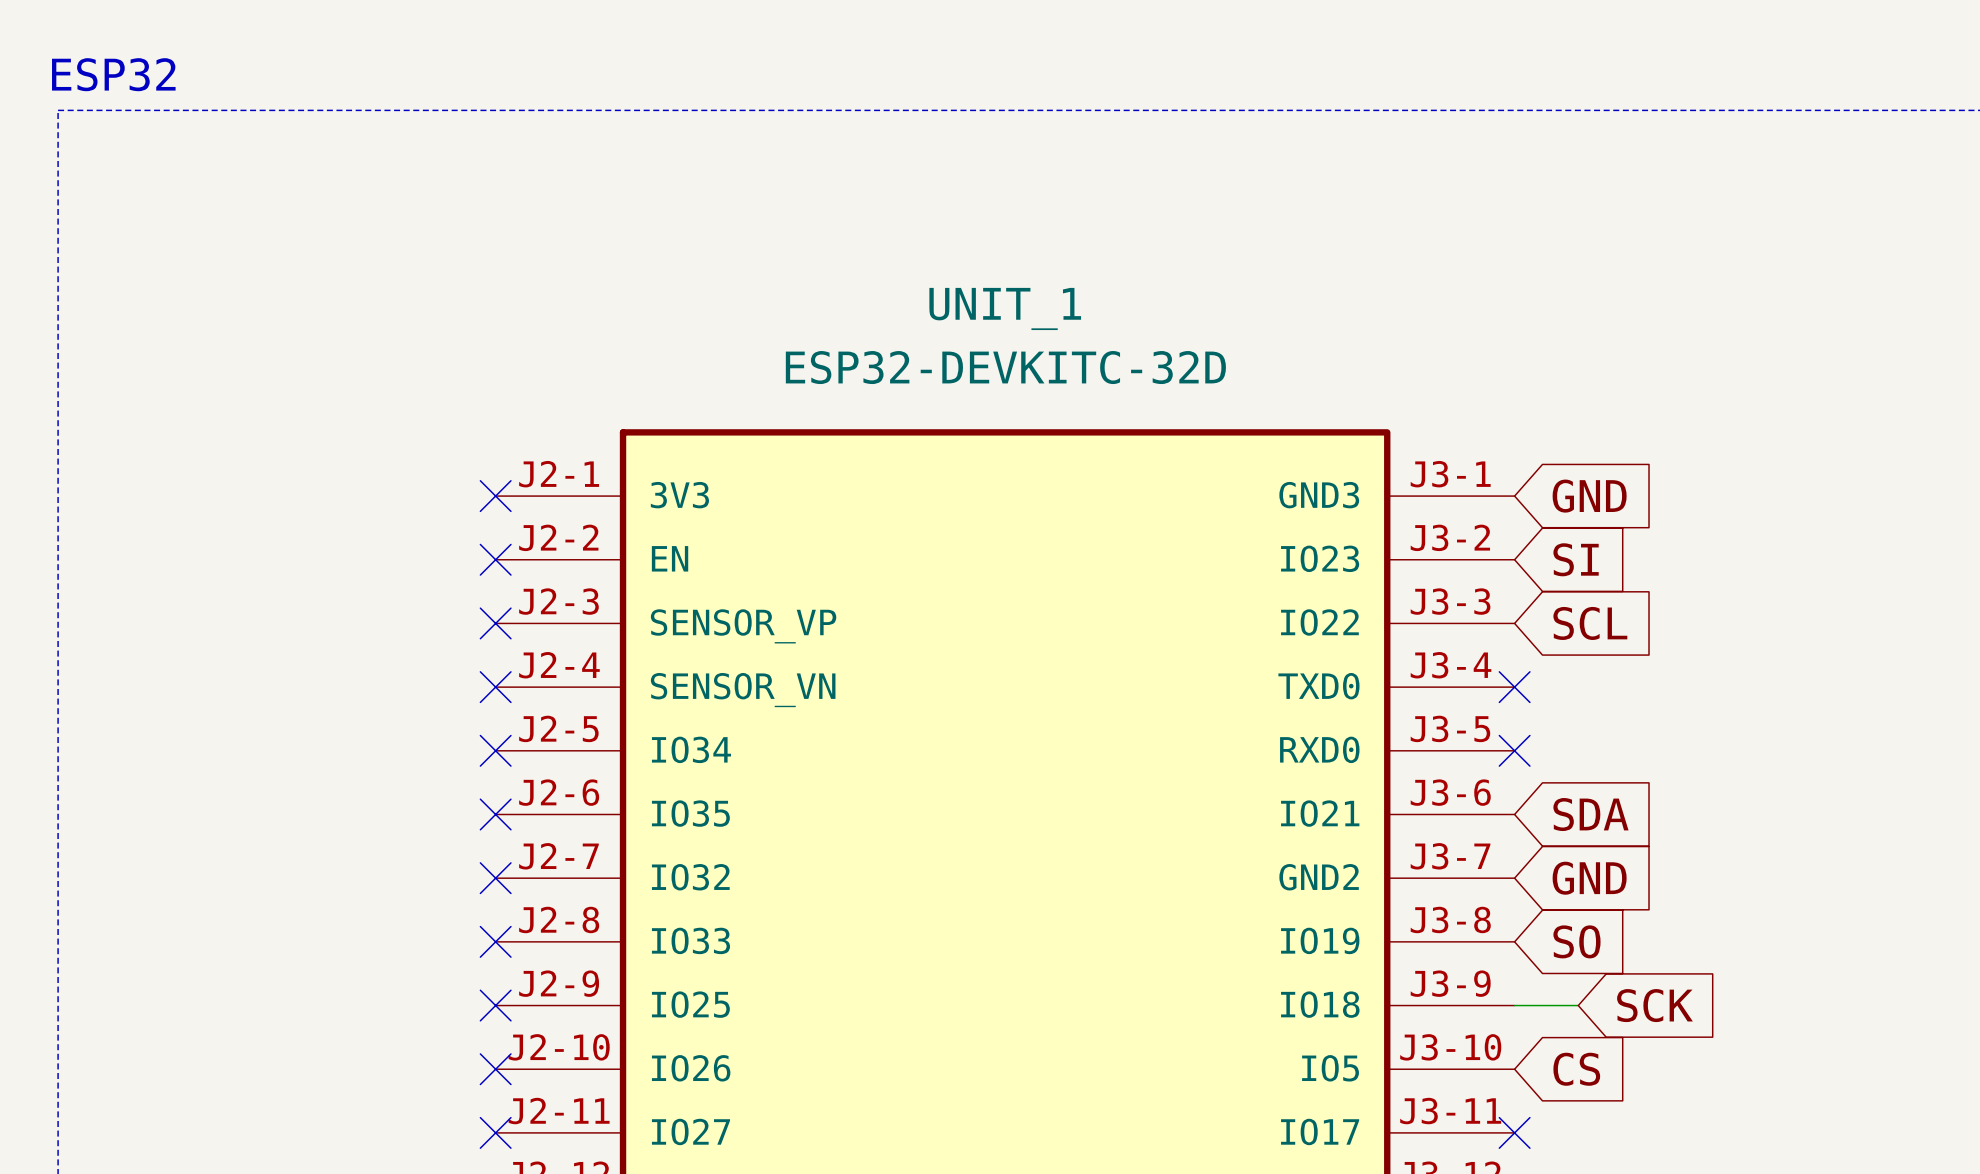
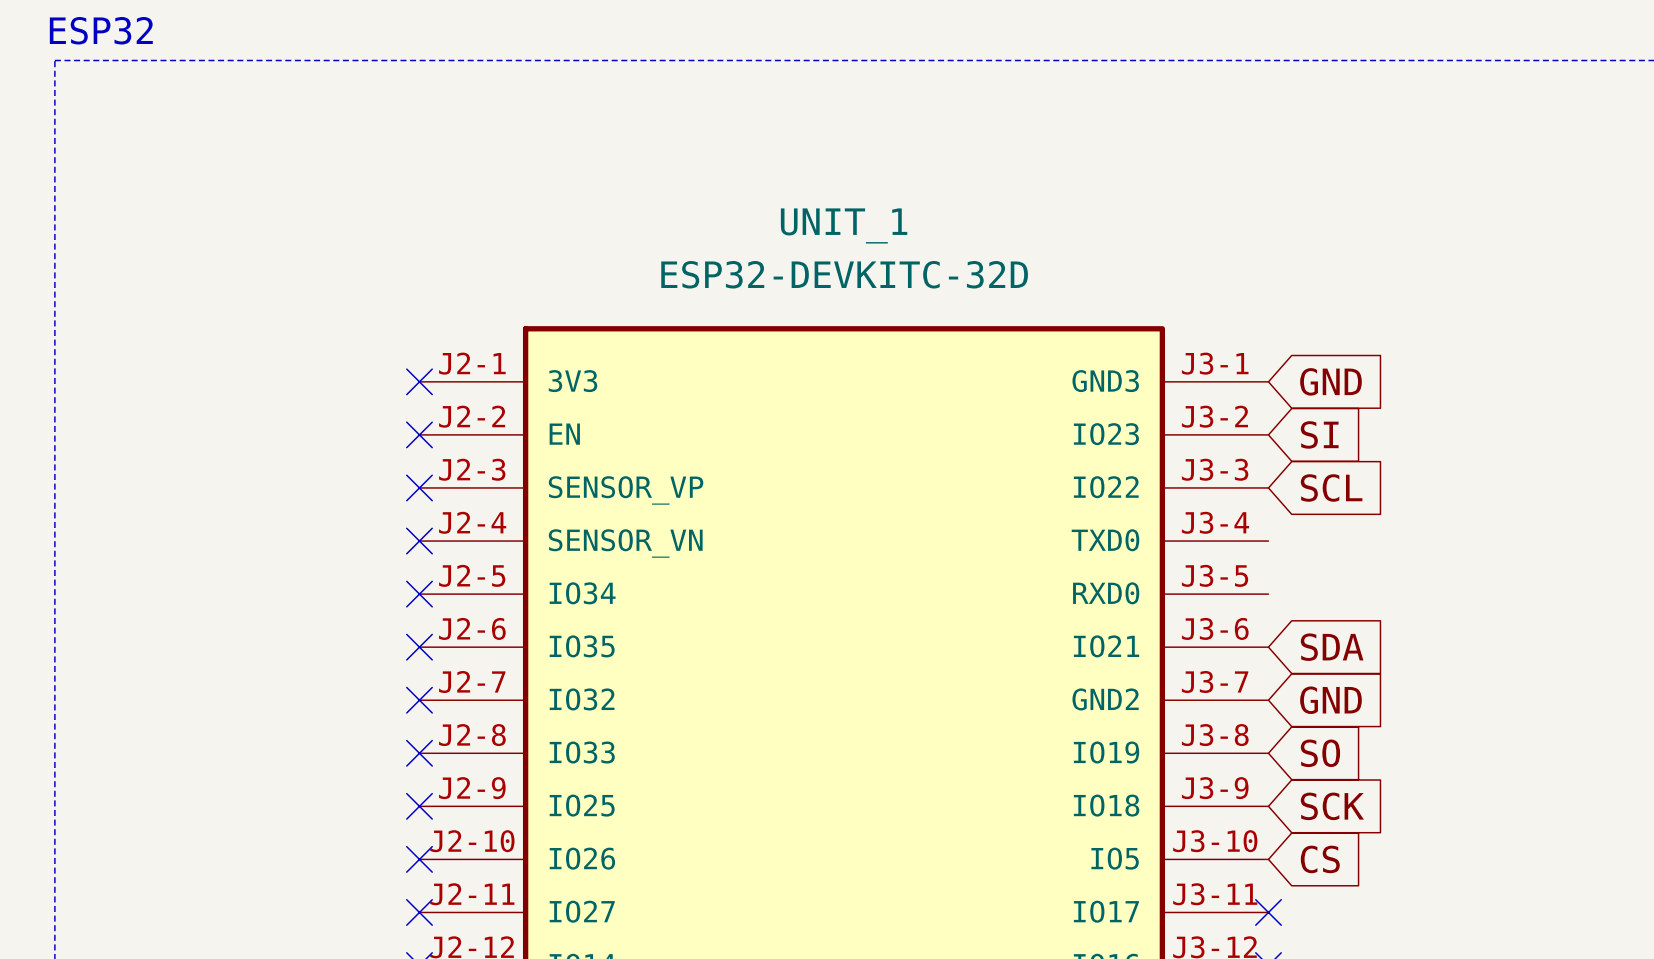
no-connect mark: (1514, 687) -> none
no-connect mark: (1514, 750) -> none
wire: (1514, 1005) (1578, 1005) -> none
global label position: SCK (1654, 1005) -> SCK (1332, 806)

